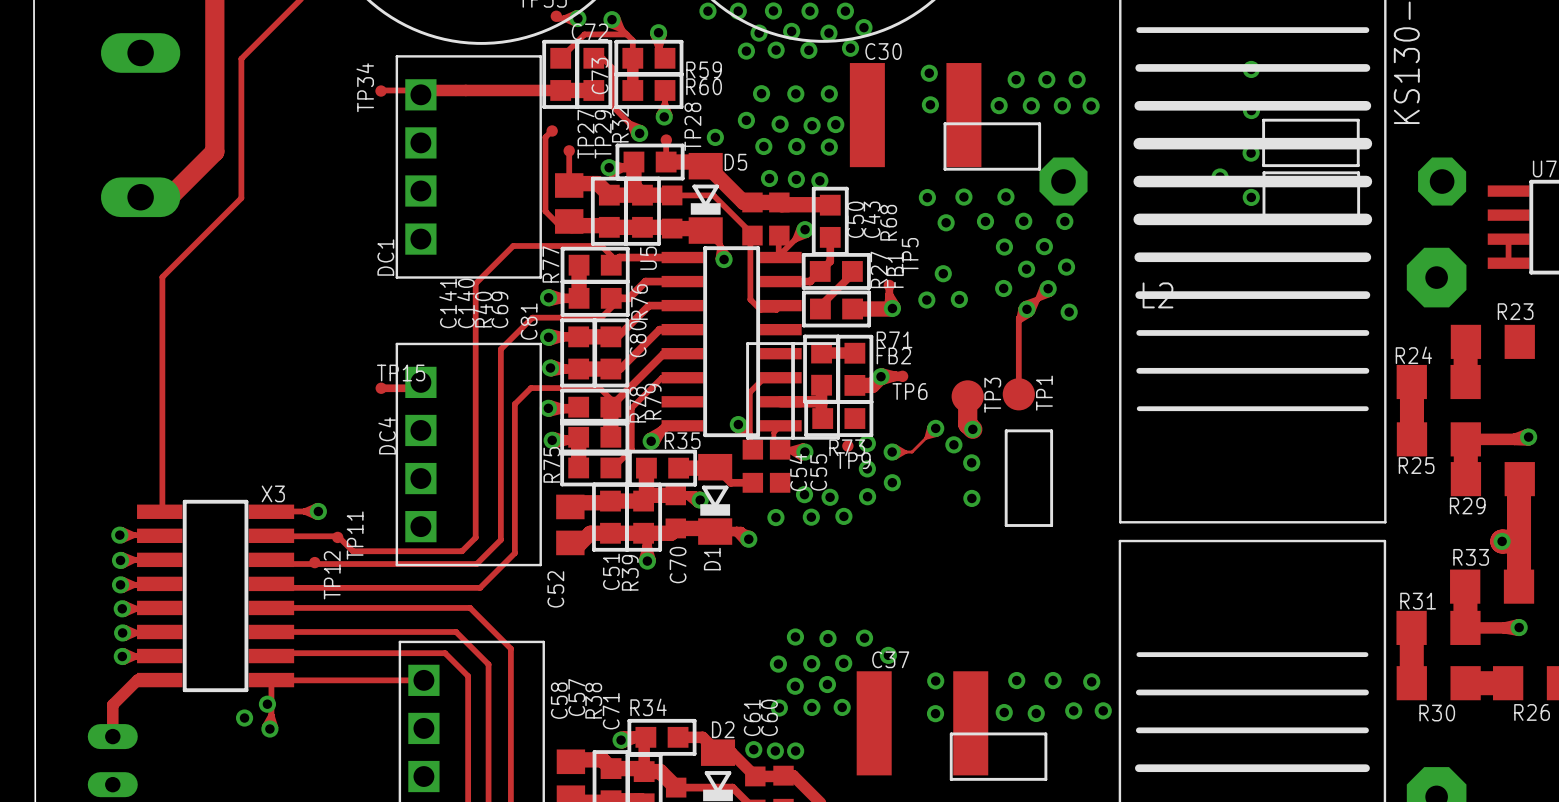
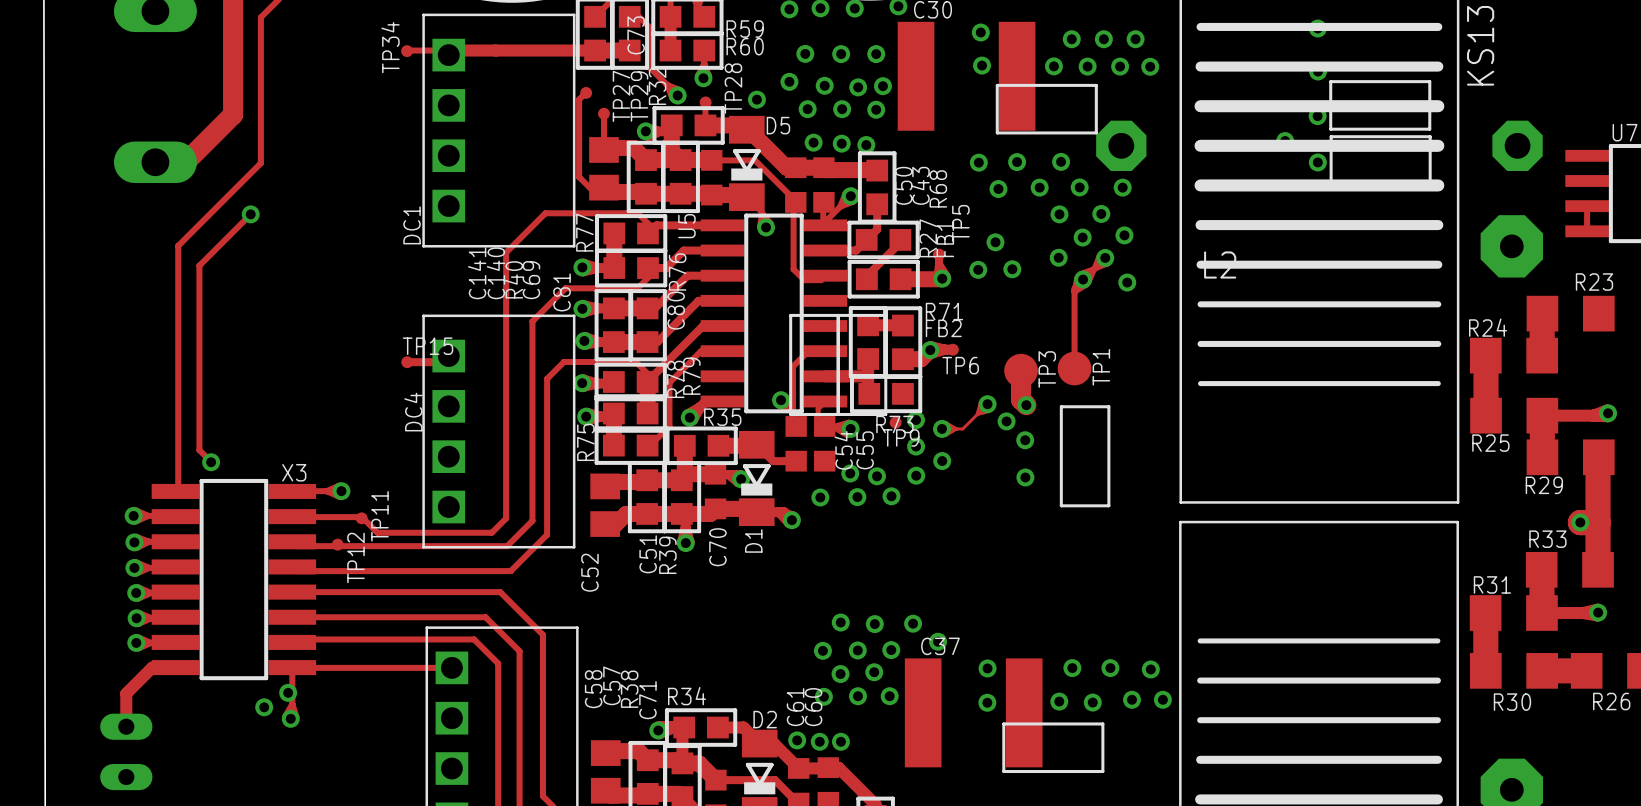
track: none -> (250, 214) (199, 265) (199, 450) (211, 461)
via: none -> (250, 214)
via: none -> (211, 462)

